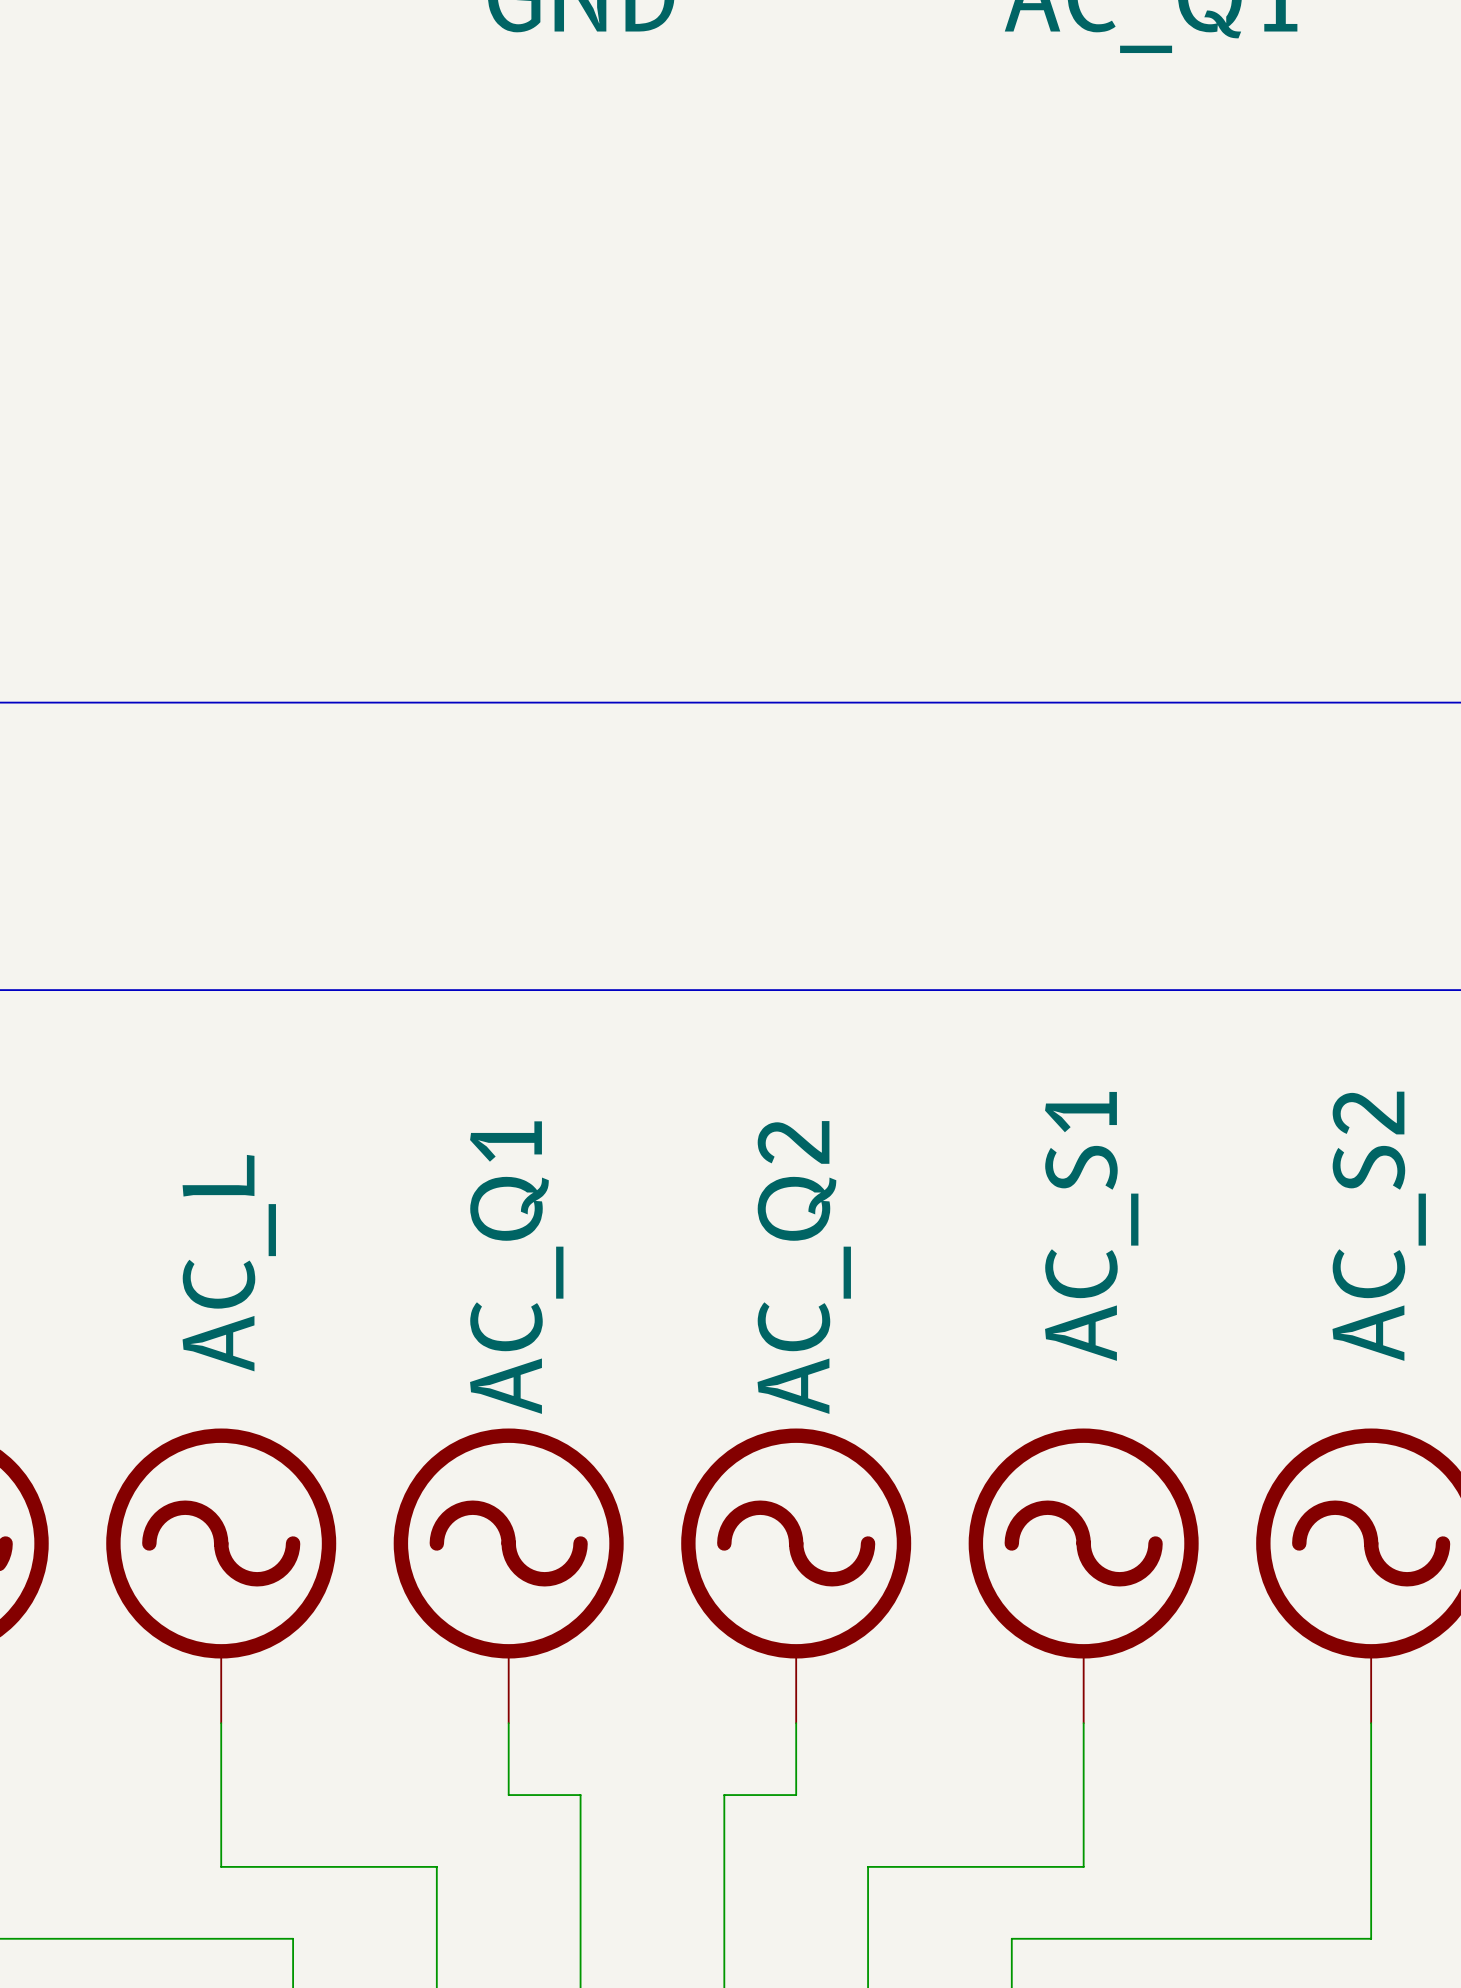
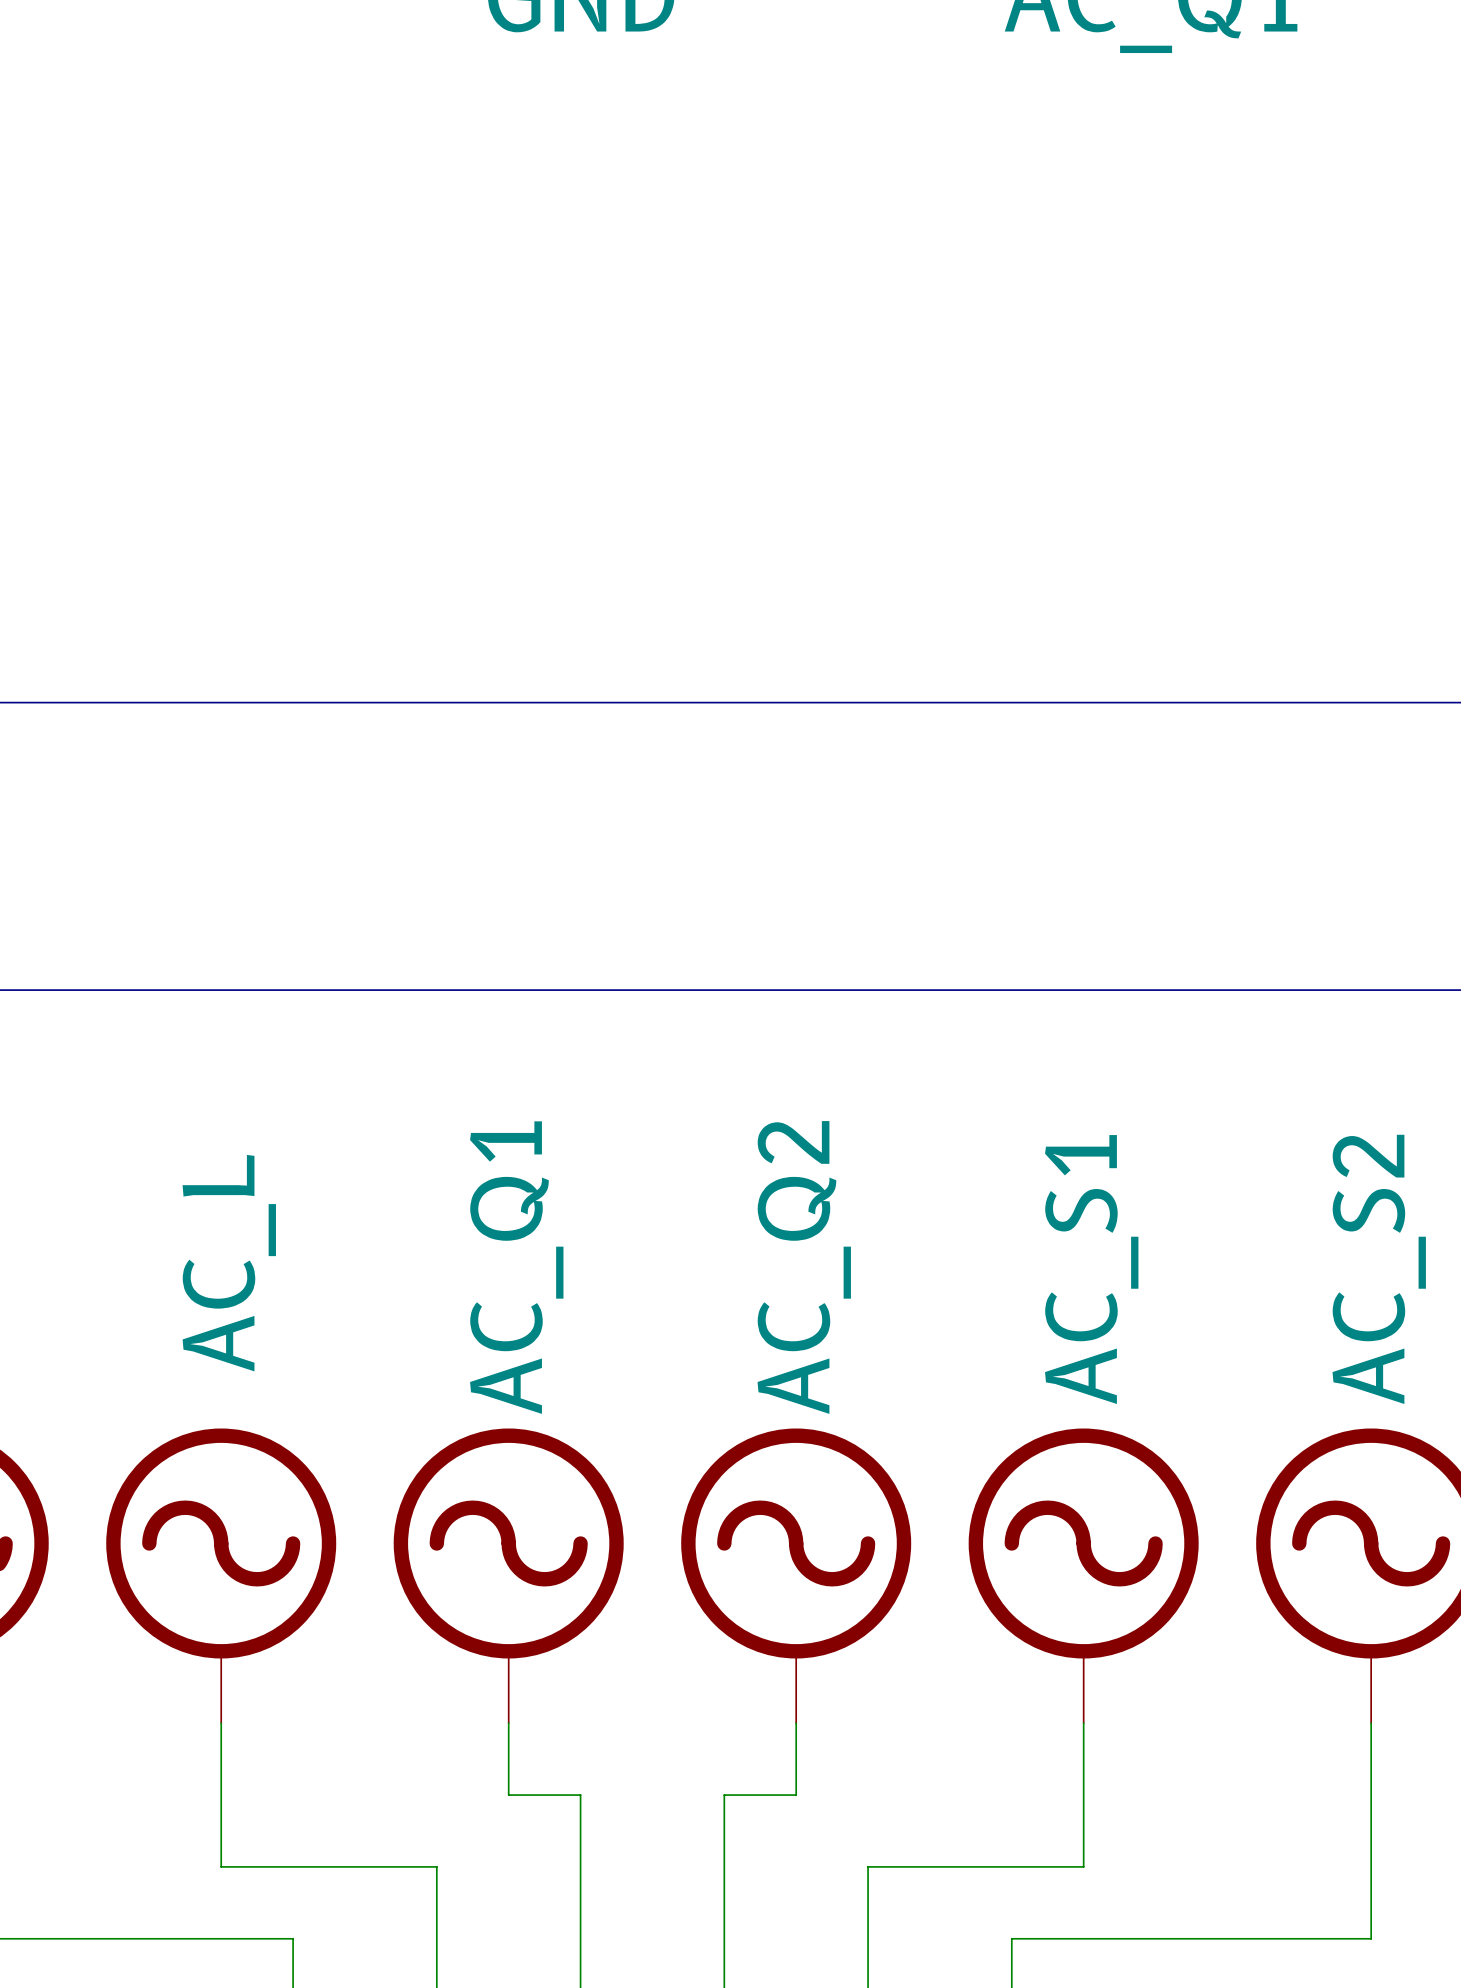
power symbol text position: AC_S1 (1091, 1226) -> AC_S1 (1091, 1269)
power symbol text position: AC_S2 (1379, 1226) -> AC_S2 (1379, 1269)

